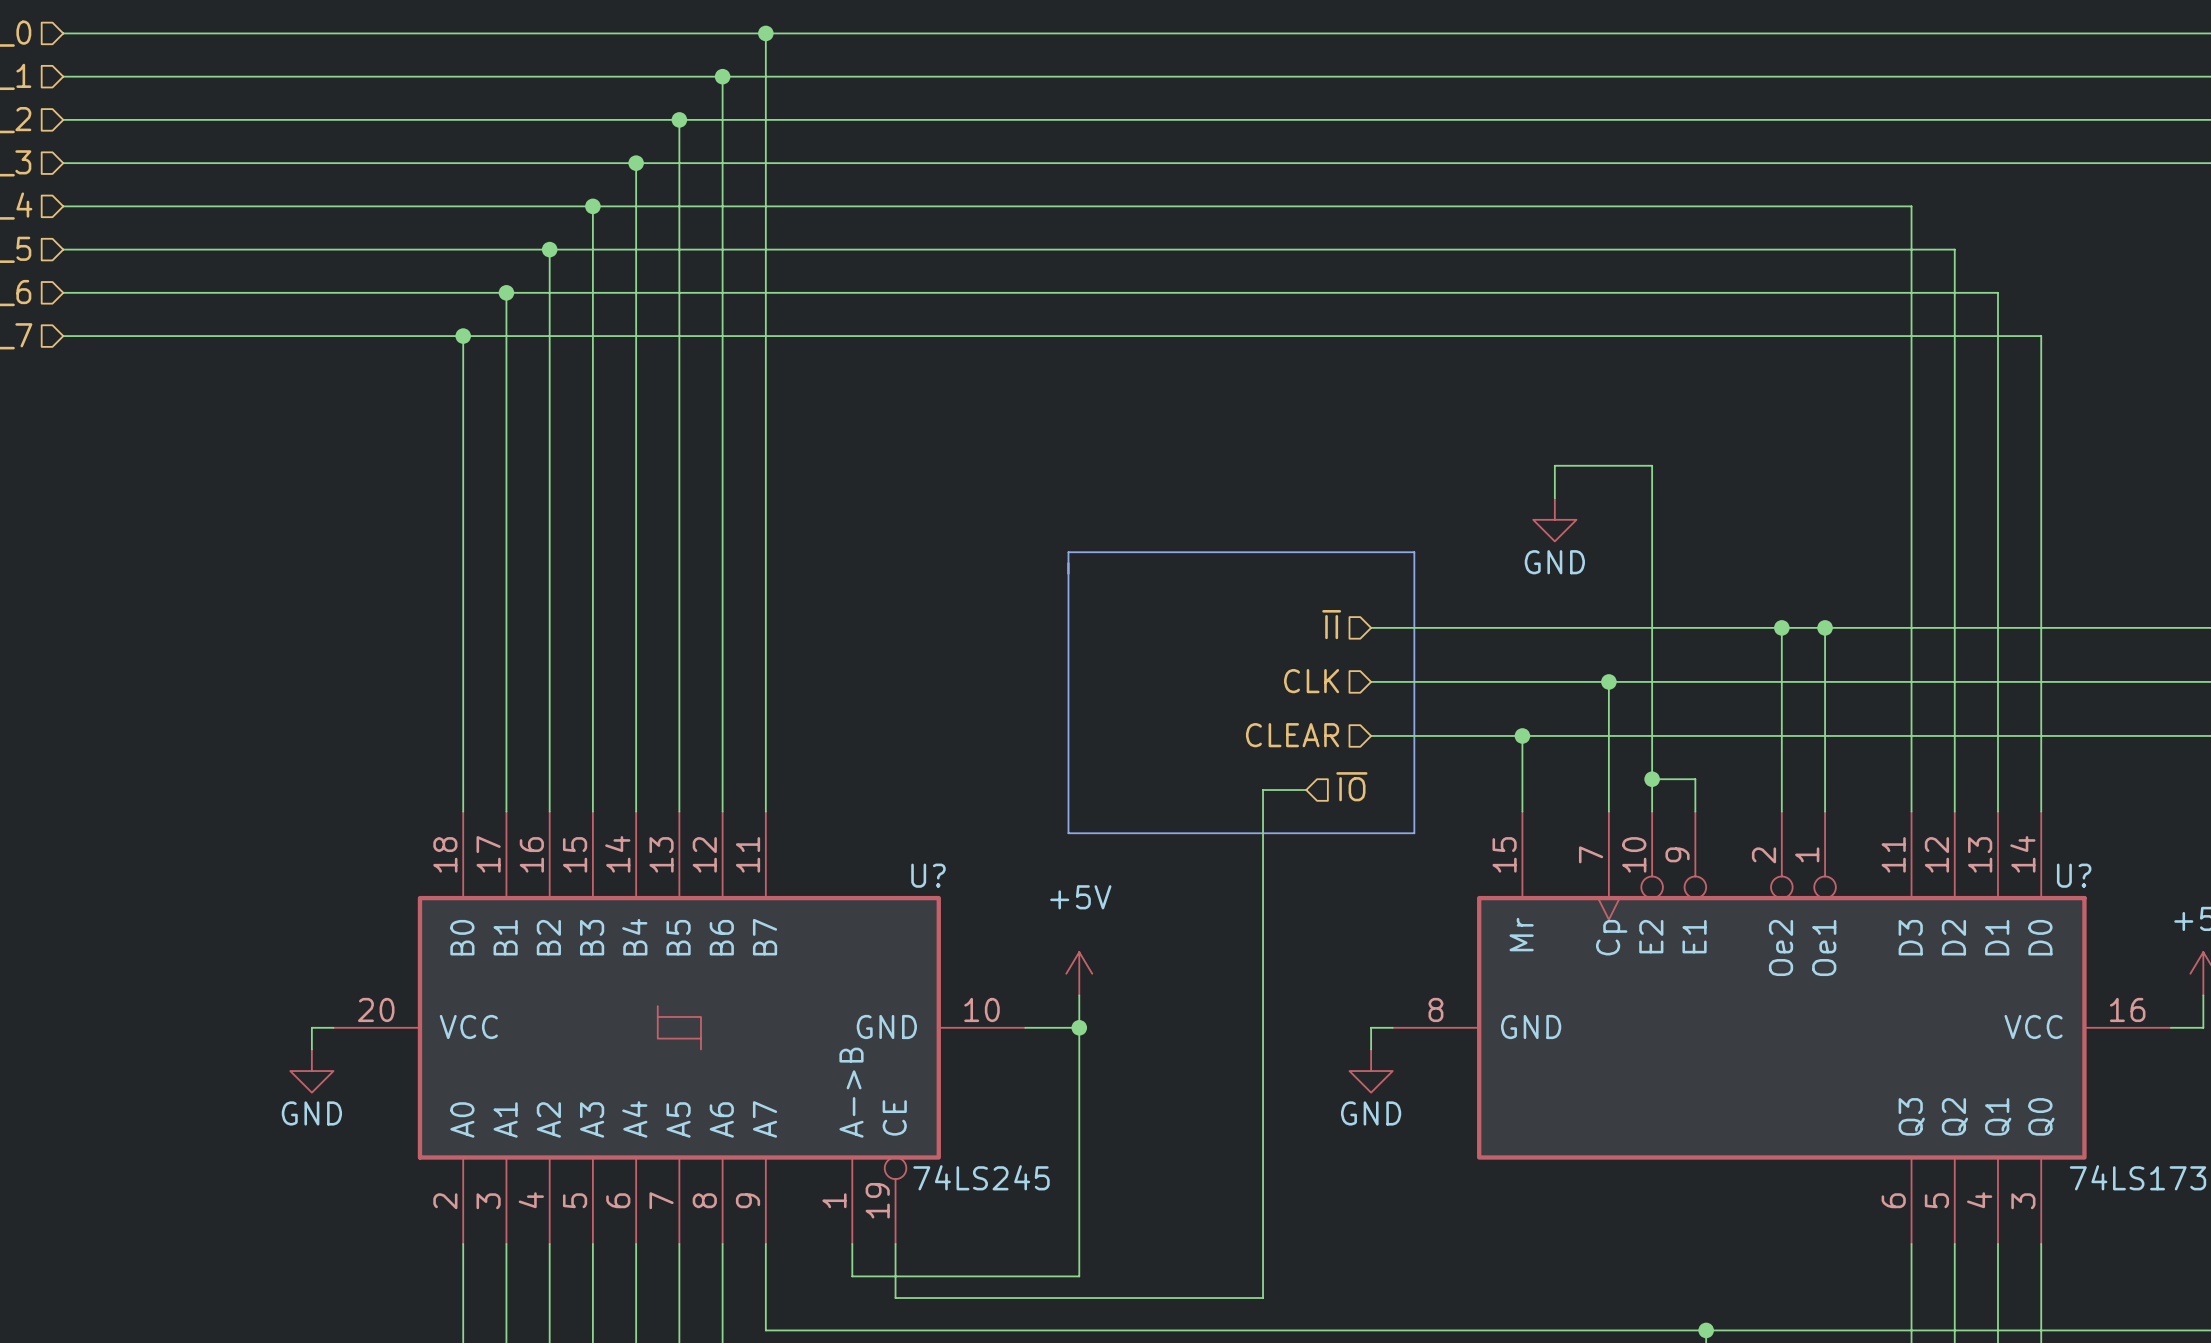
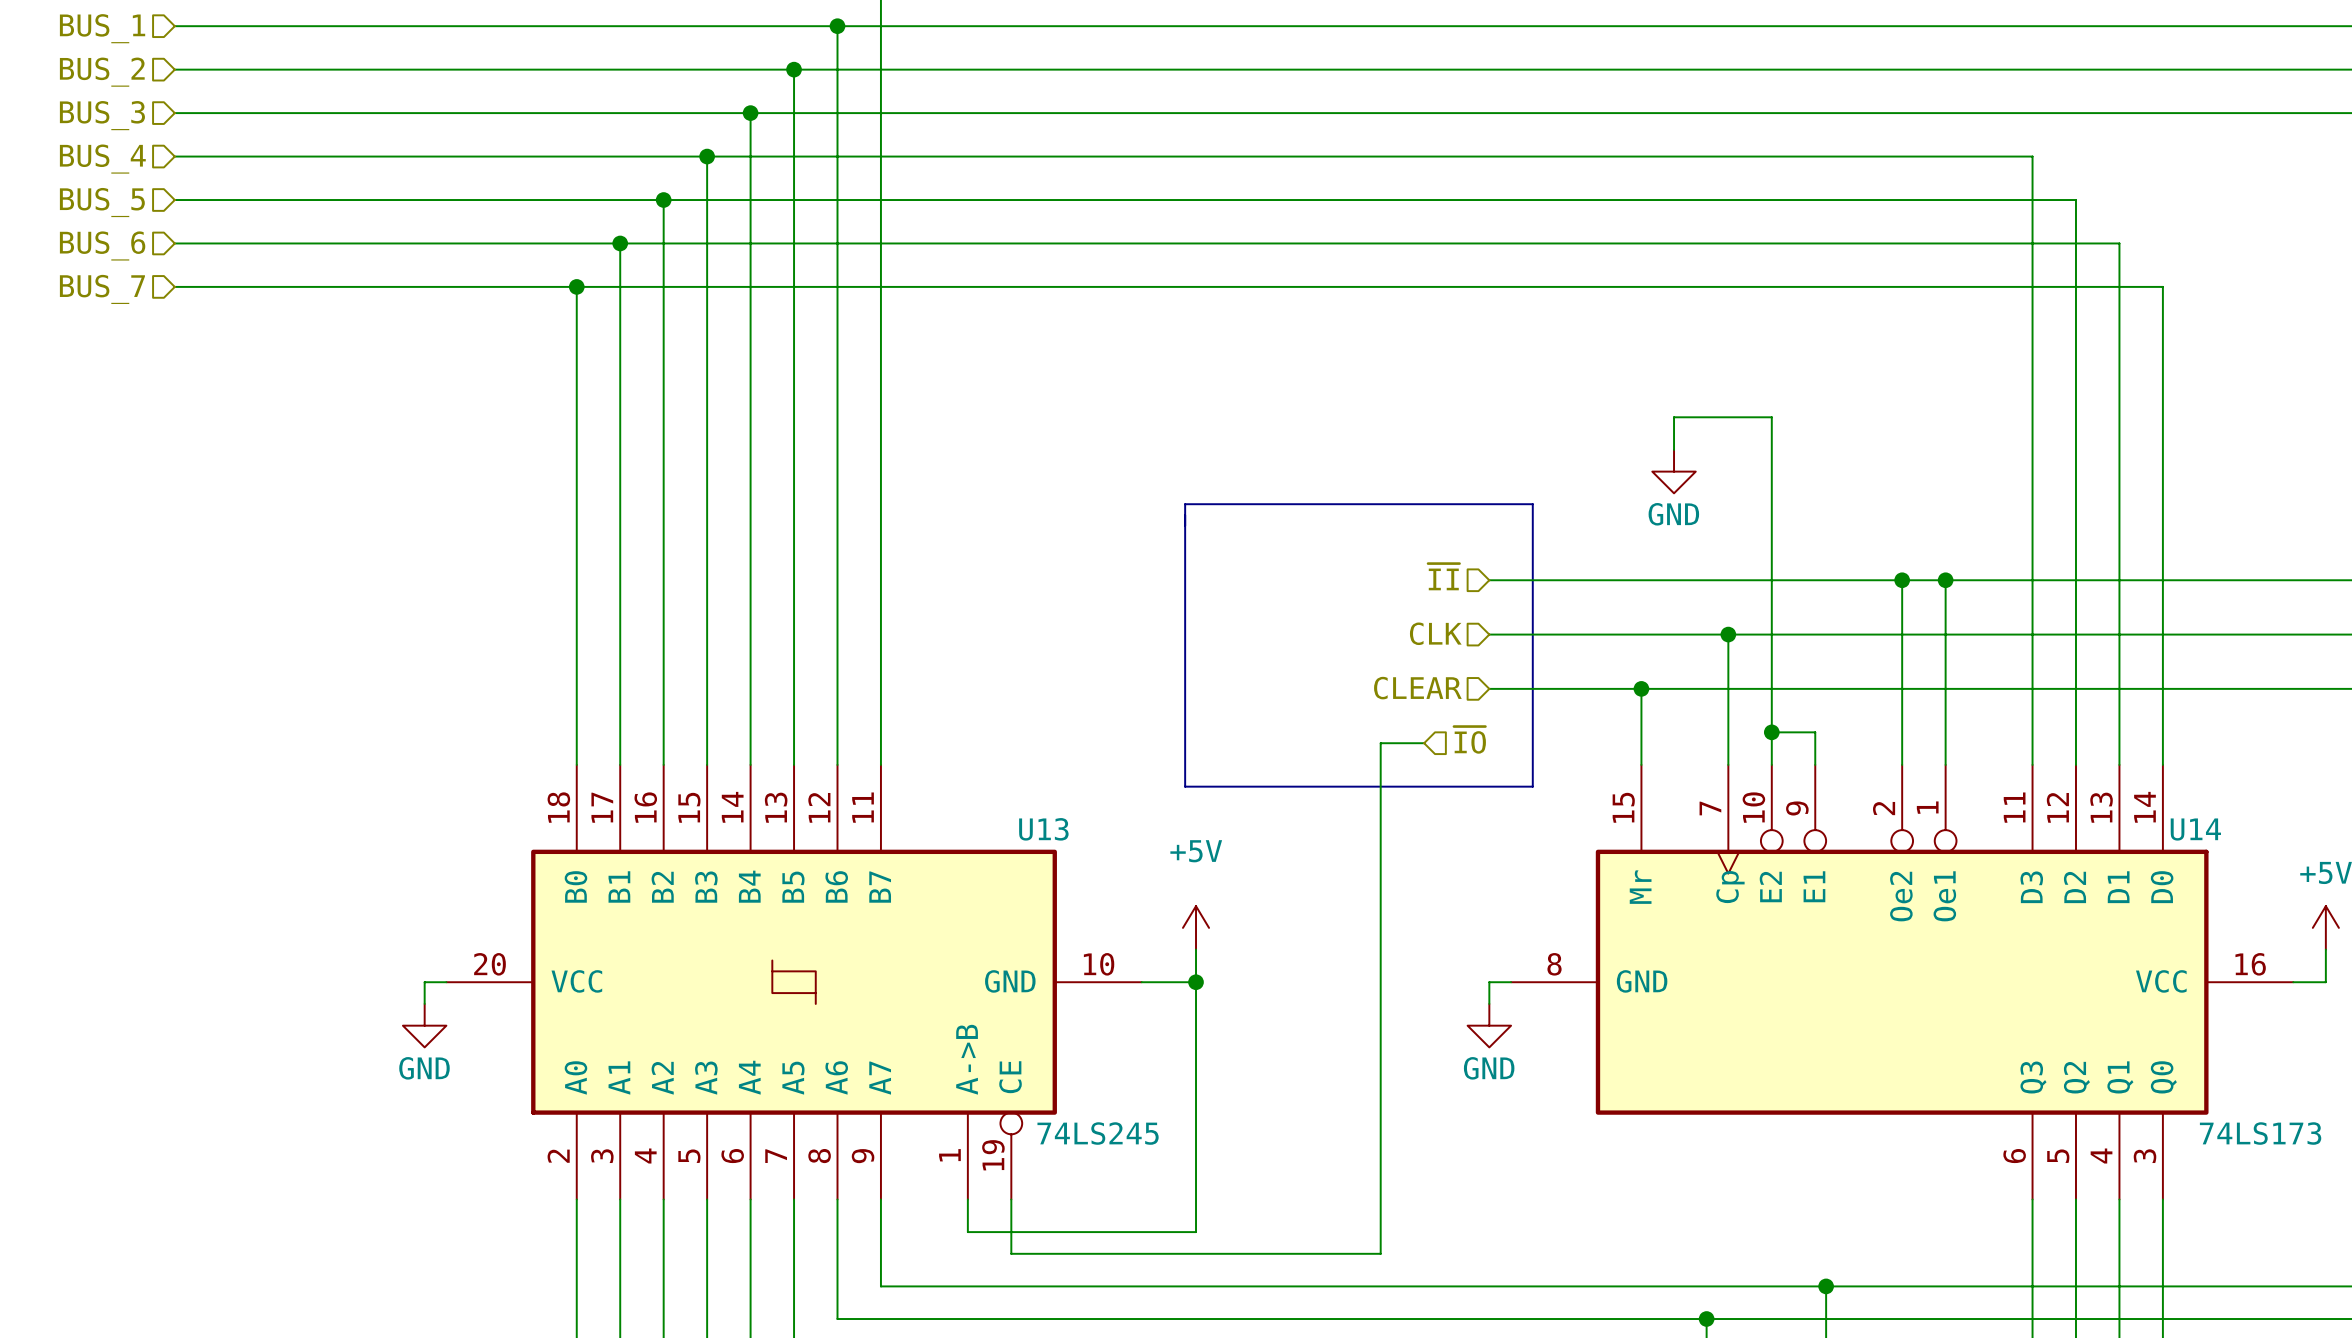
U? name: U? (928, 875) -> U13 (1043, 829)
U? name: U? (2074, 875) -> U14 (2195, 829)

